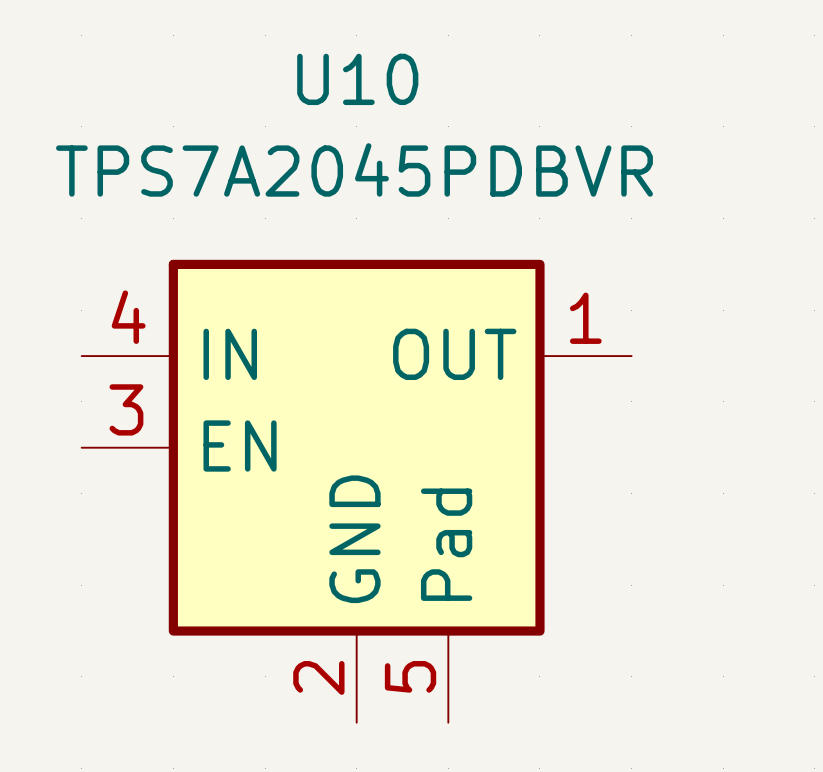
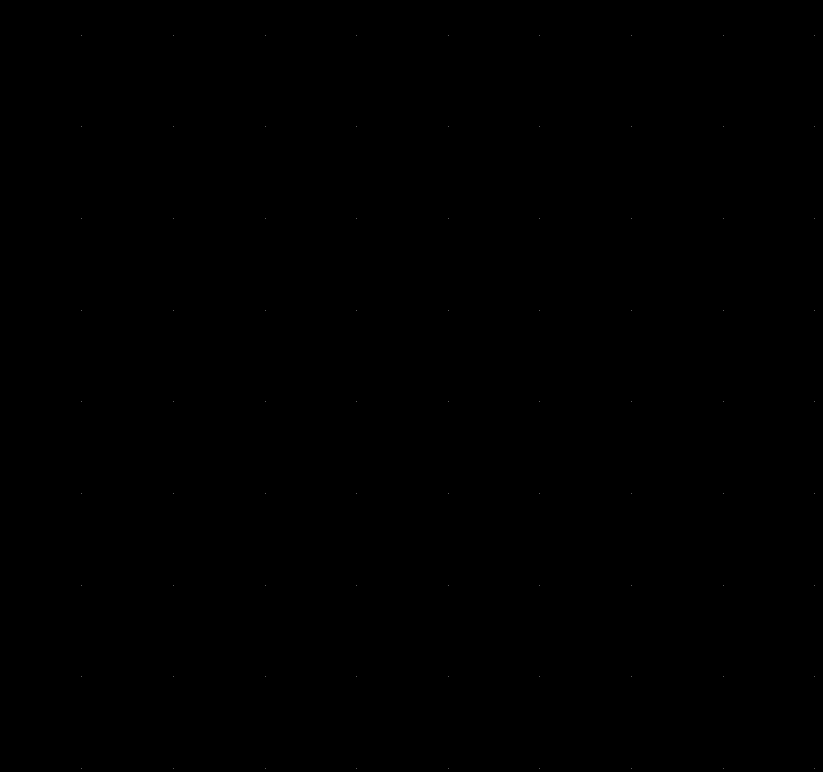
U10: TPS7A2045PDBVR (356, 491) -> none

